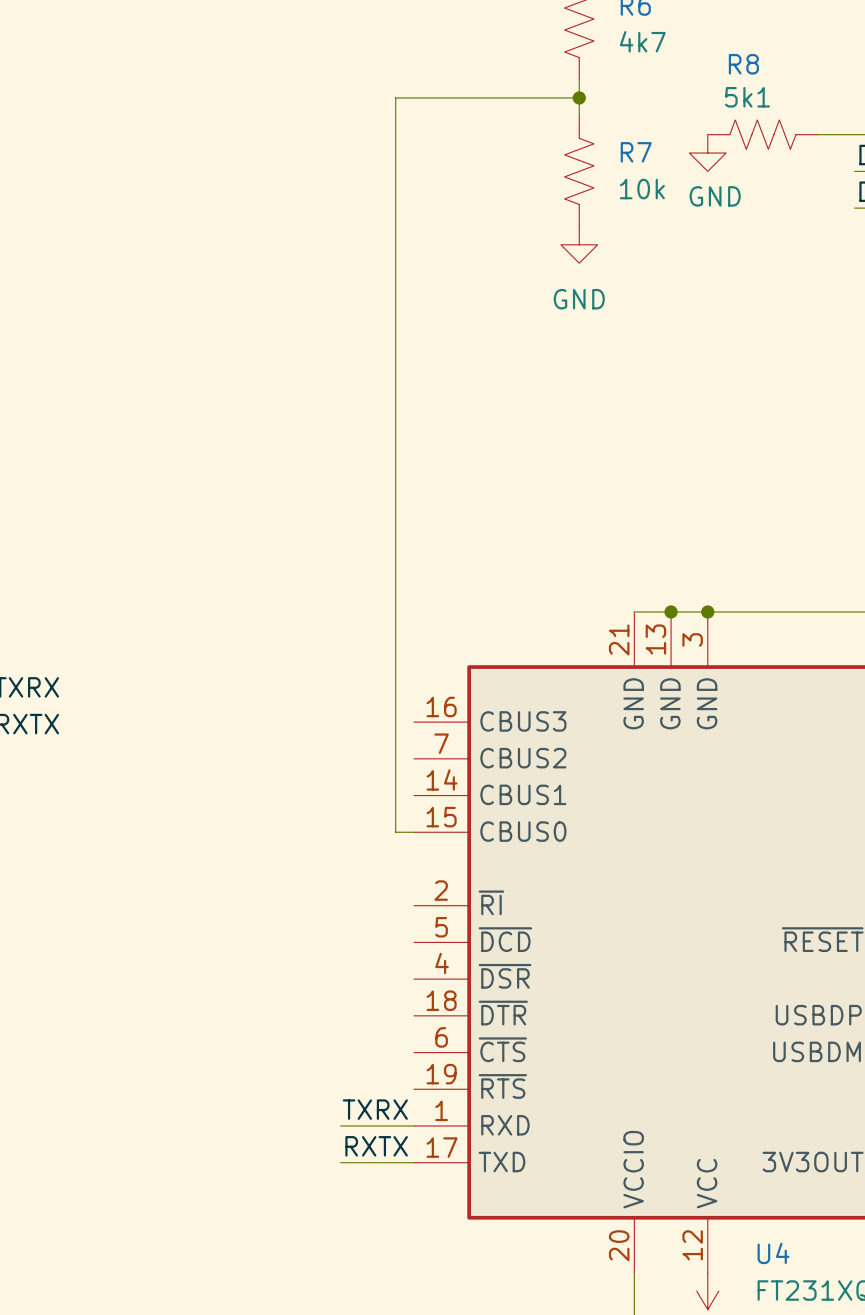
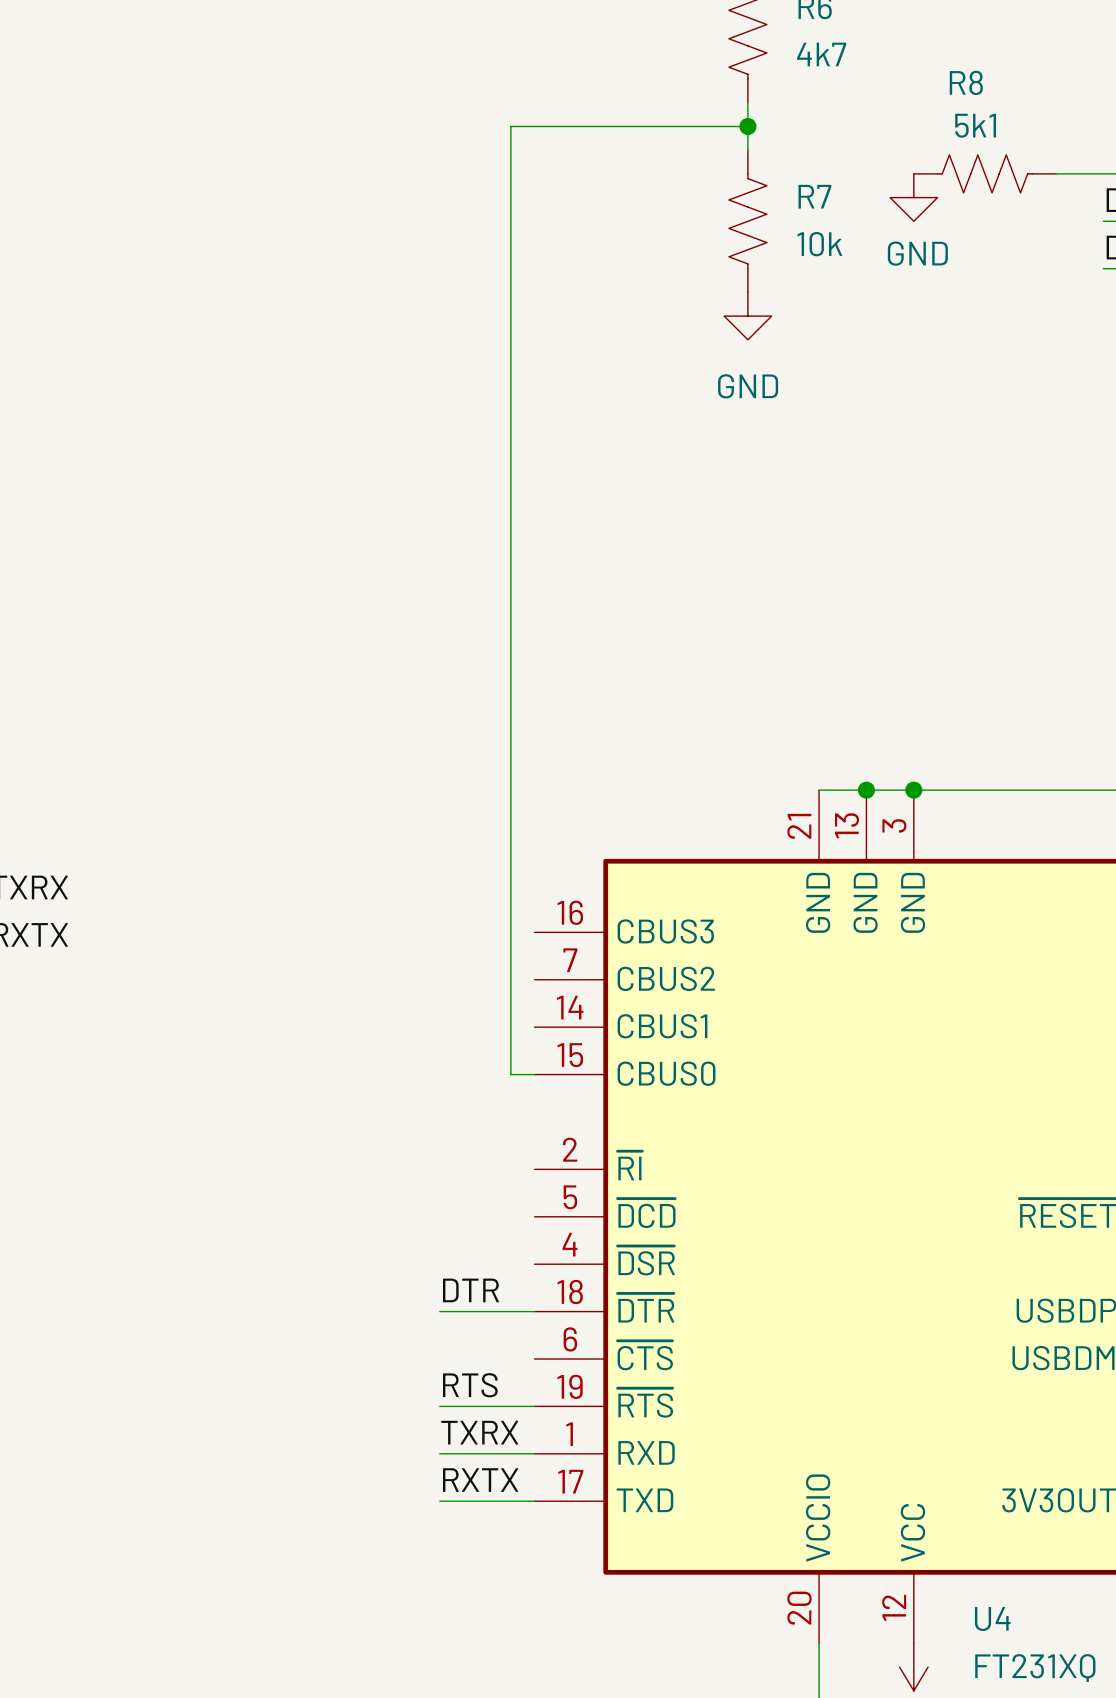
label: none -> DTR (471, 1290)
wire: none -> (439, 1311) (534, 1311)
label: none -> RTS (470, 1385)
wire: none -> (439, 1406) (534, 1406)

